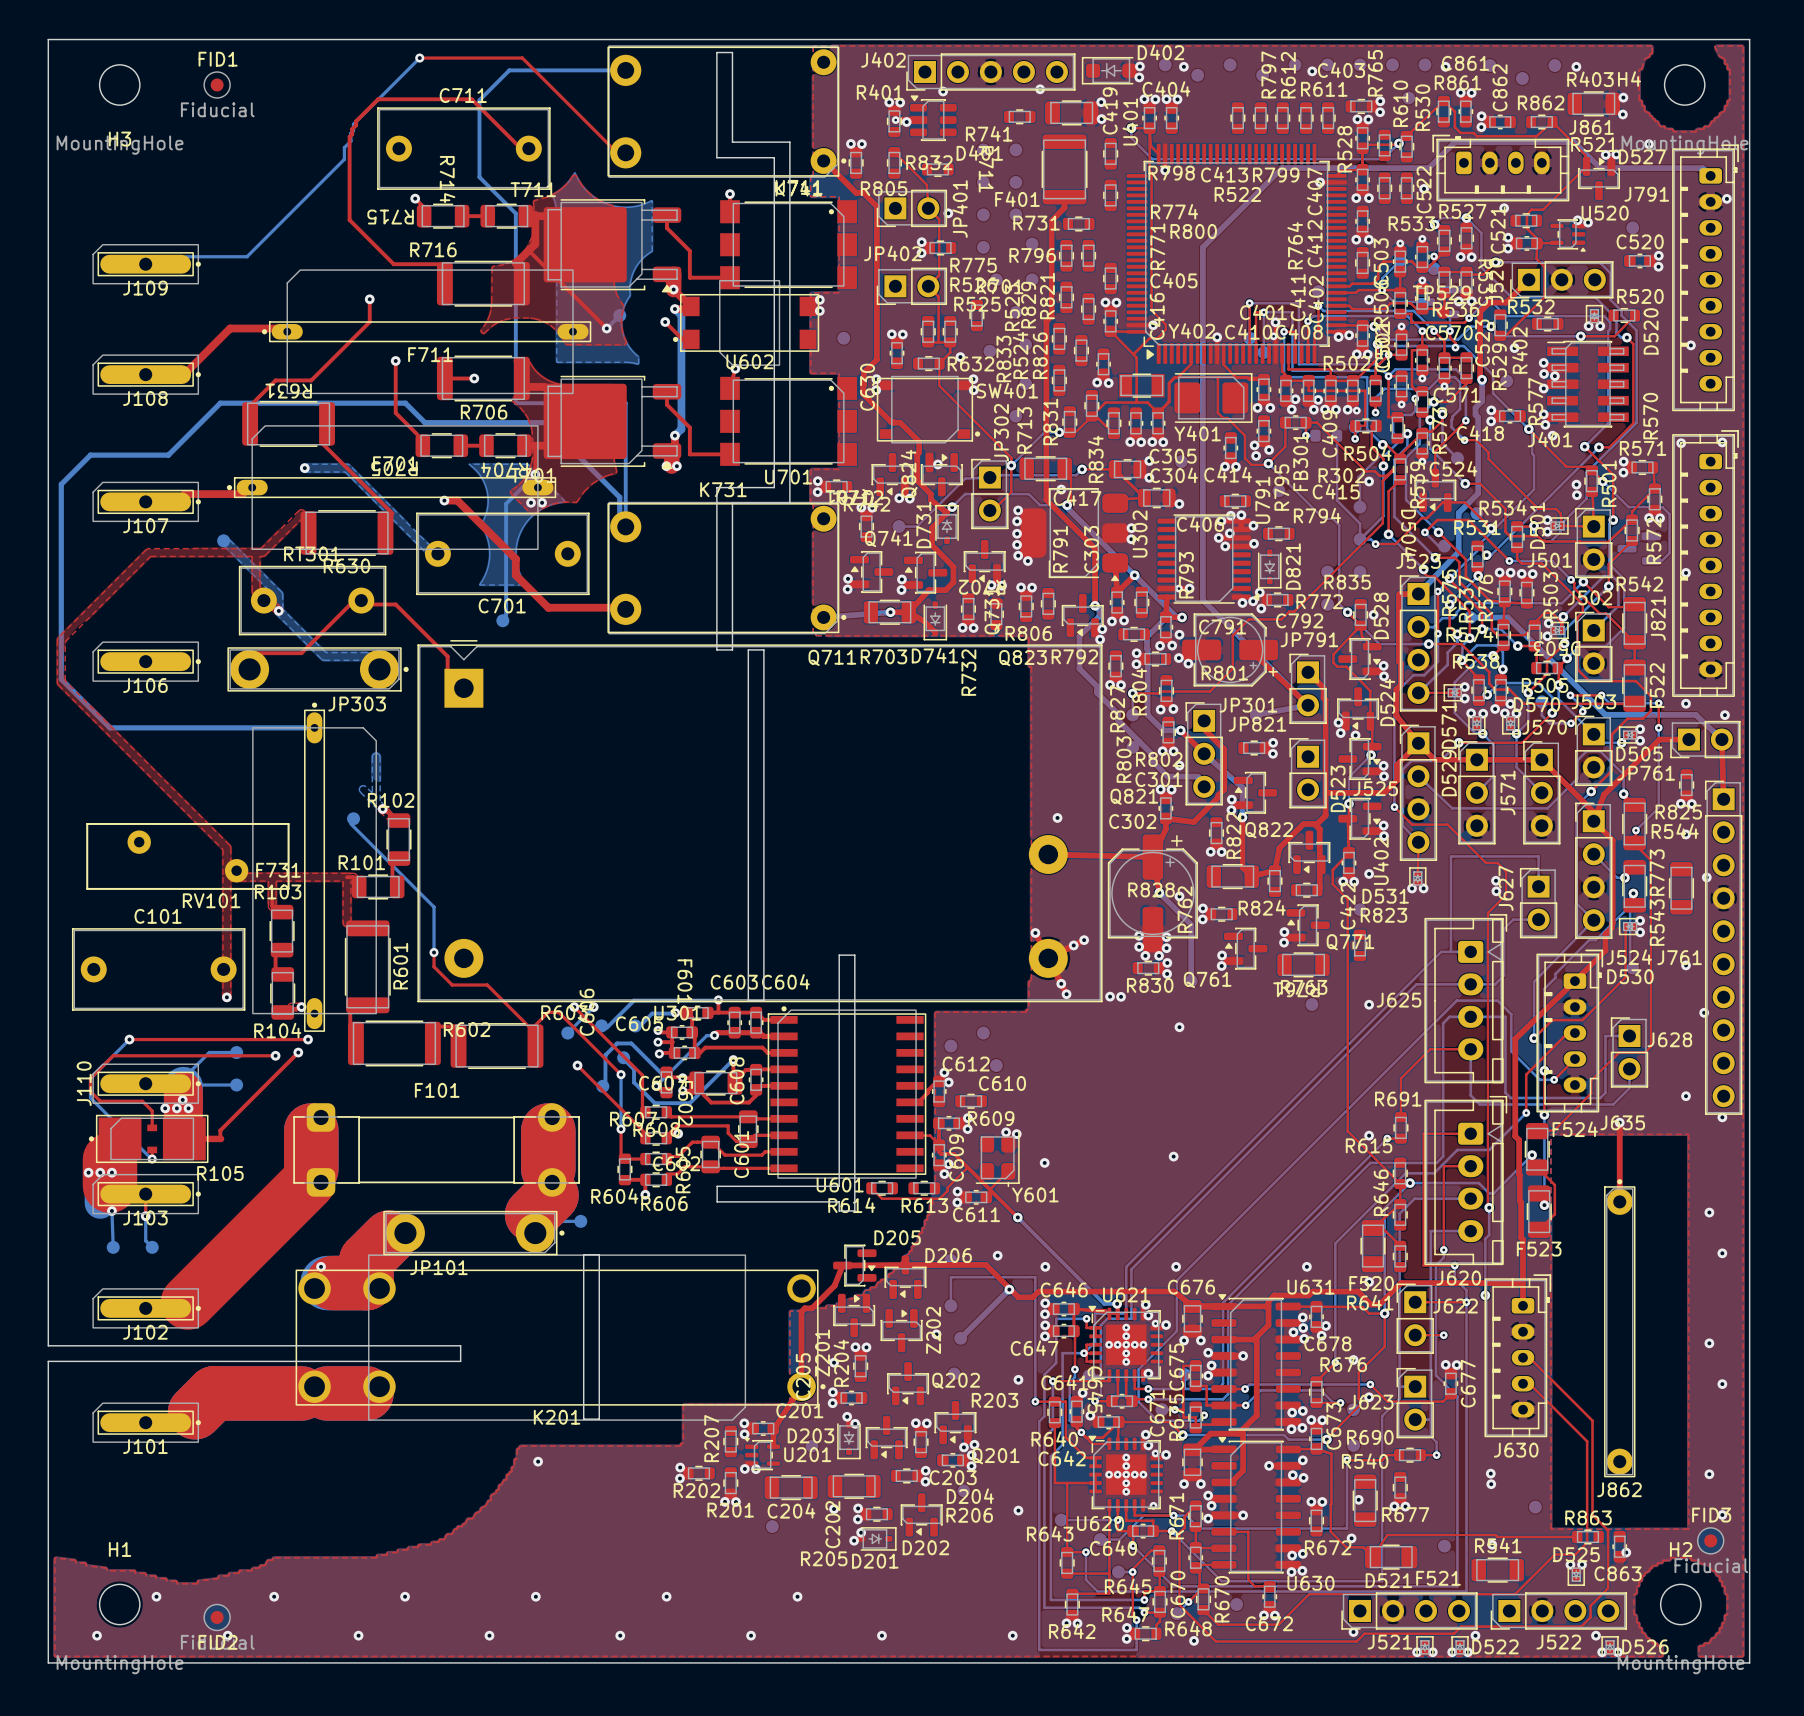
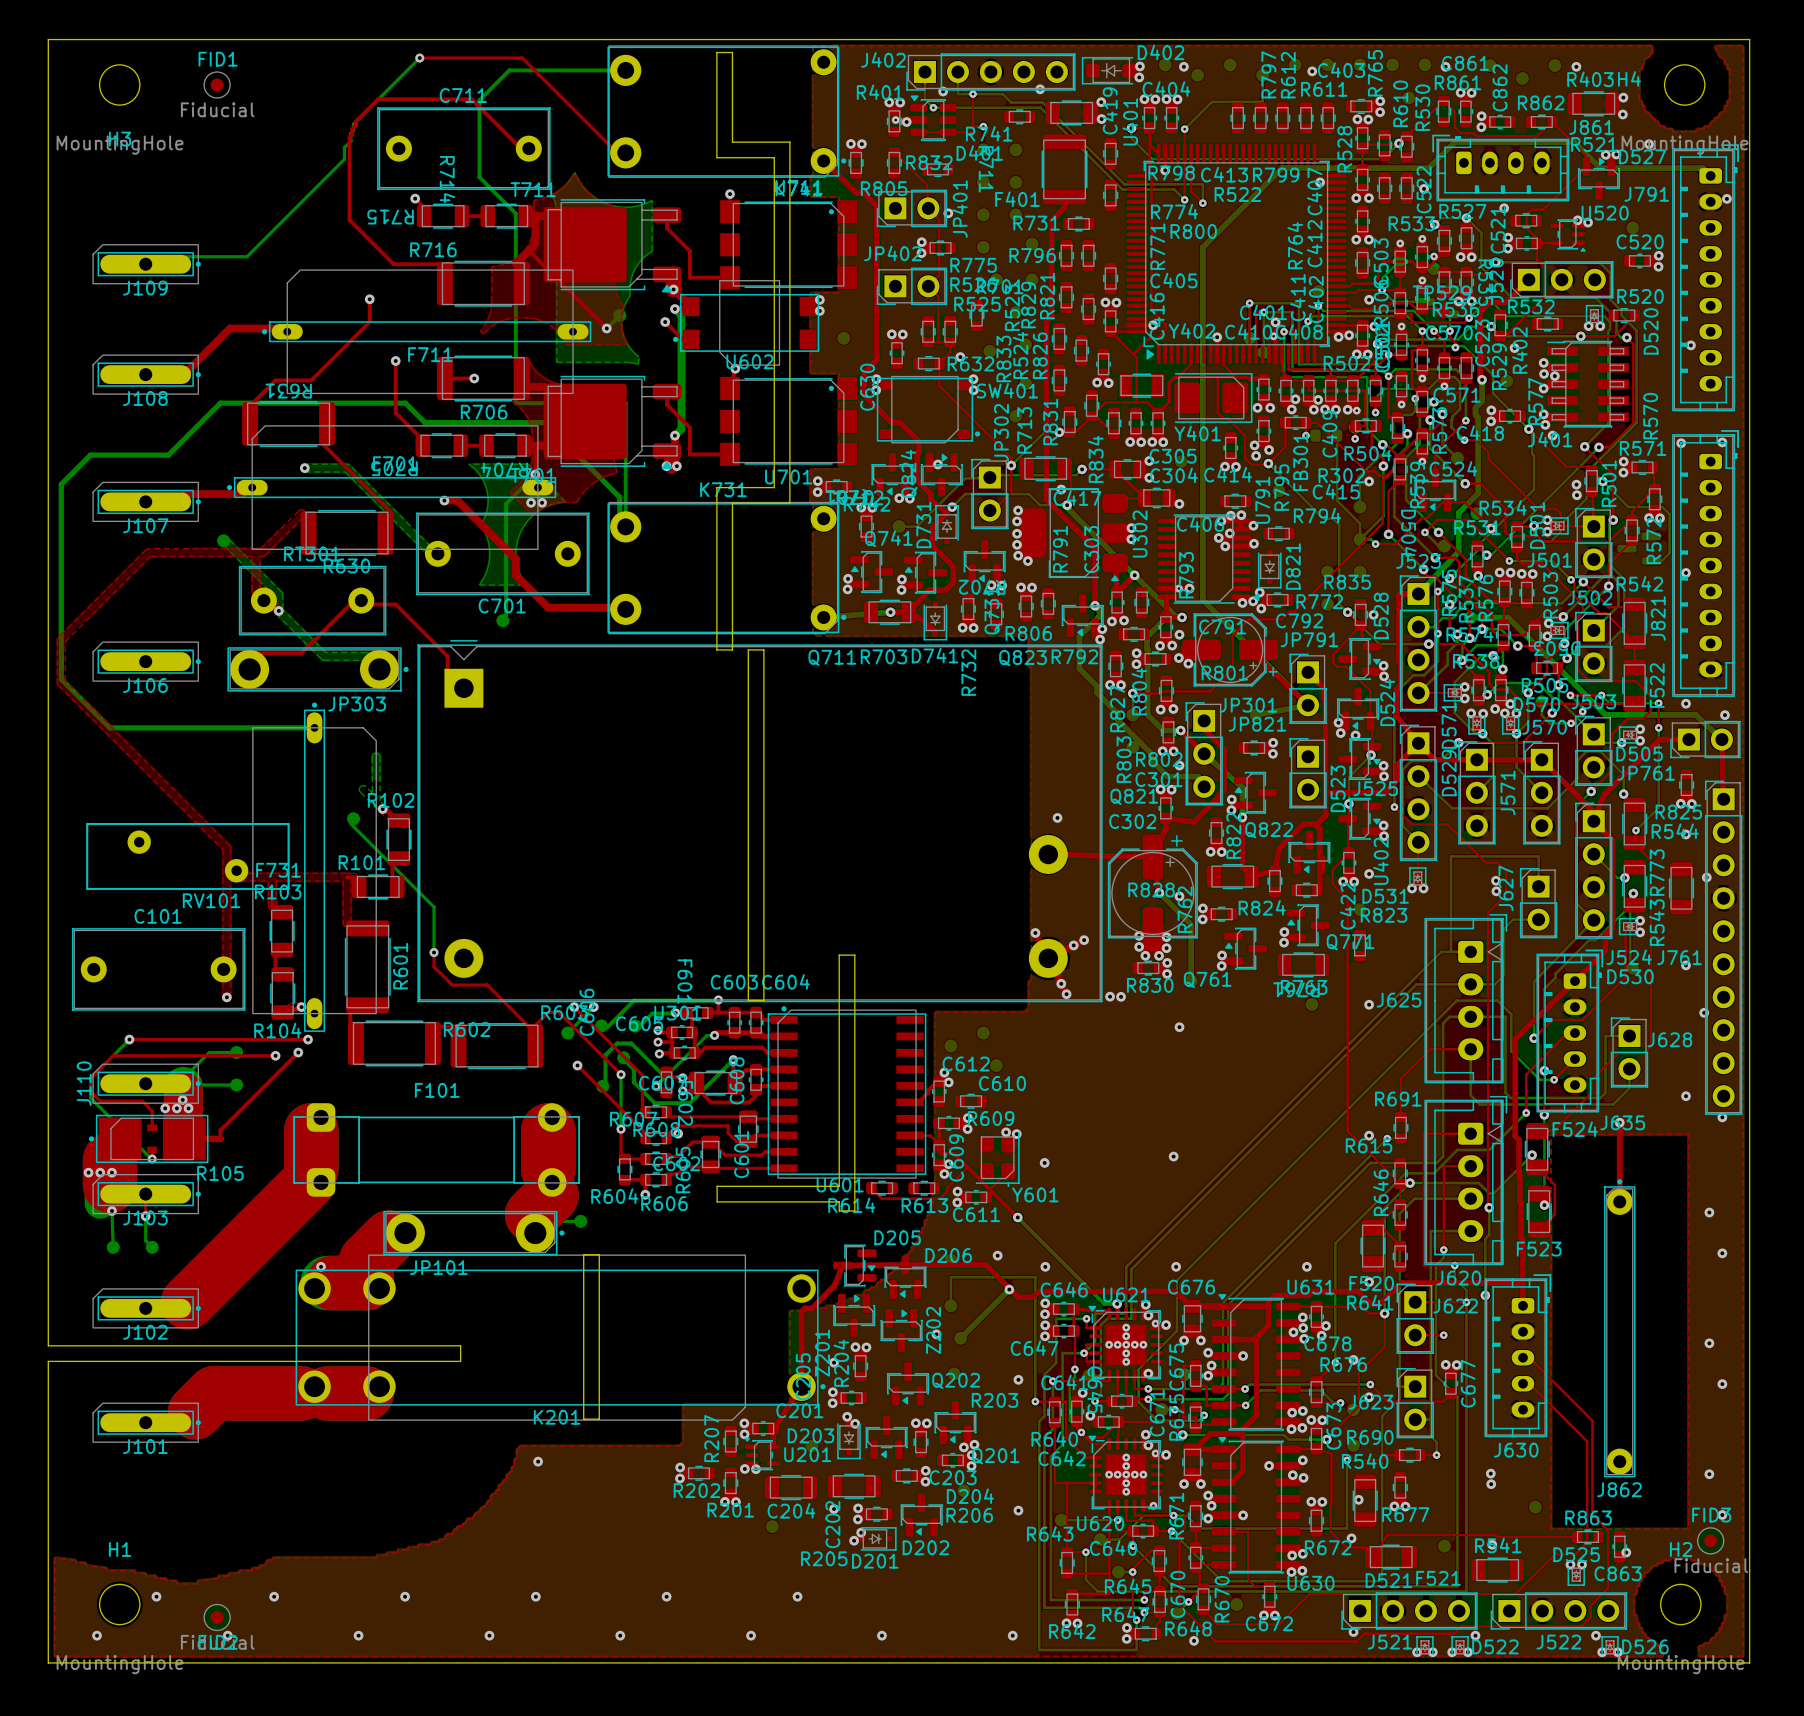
bottom track: none -> (924, 72) (924, 99) (933, 107) (1040, 107) (1122, 189) (1174, 189) (1184, 199)
bottom track: none -> (957, 72) (957, 94) (1002, 94) (1011, 102) (1042, 102) (1124, 184) (1202, 184) (1202, 203)
bottom track: none -> (1262, 75) (1262, 101) (1211, 101) (1184, 129)
top track: none -> (972, 94) (972, 132) (918, 132)
via: none -> (972, 94)
via: none -> (933, 107)
top track: none -> (972, 126) (983, 126)
via: none -> (983, 126)
top track: none -> (1184, 129) (1184, 199)
via: none -> (1184, 129)
top track: none -> (1191, 154) (1191, 191) (1202, 203)
via: none -> (1184, 199)
via: none -> (1202, 203)

